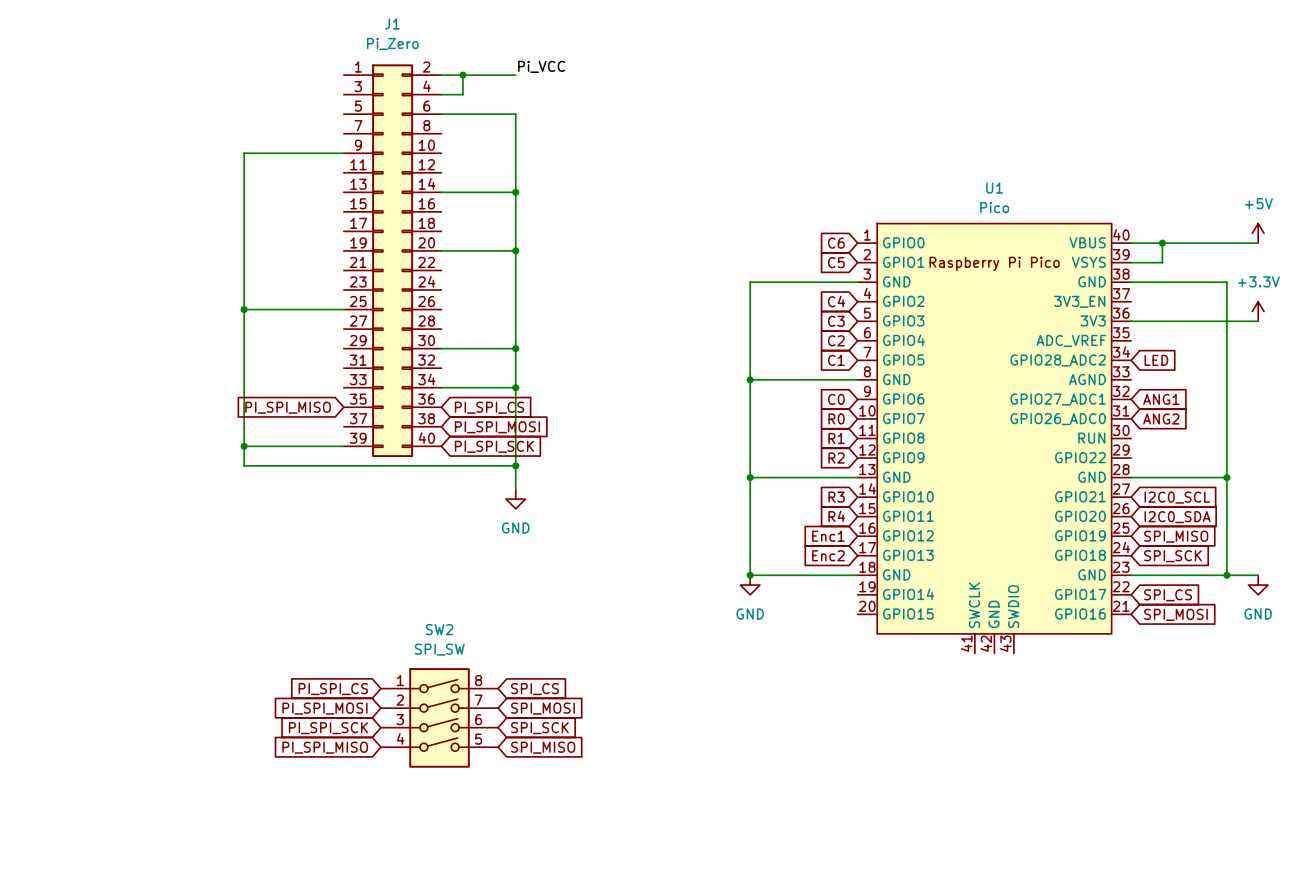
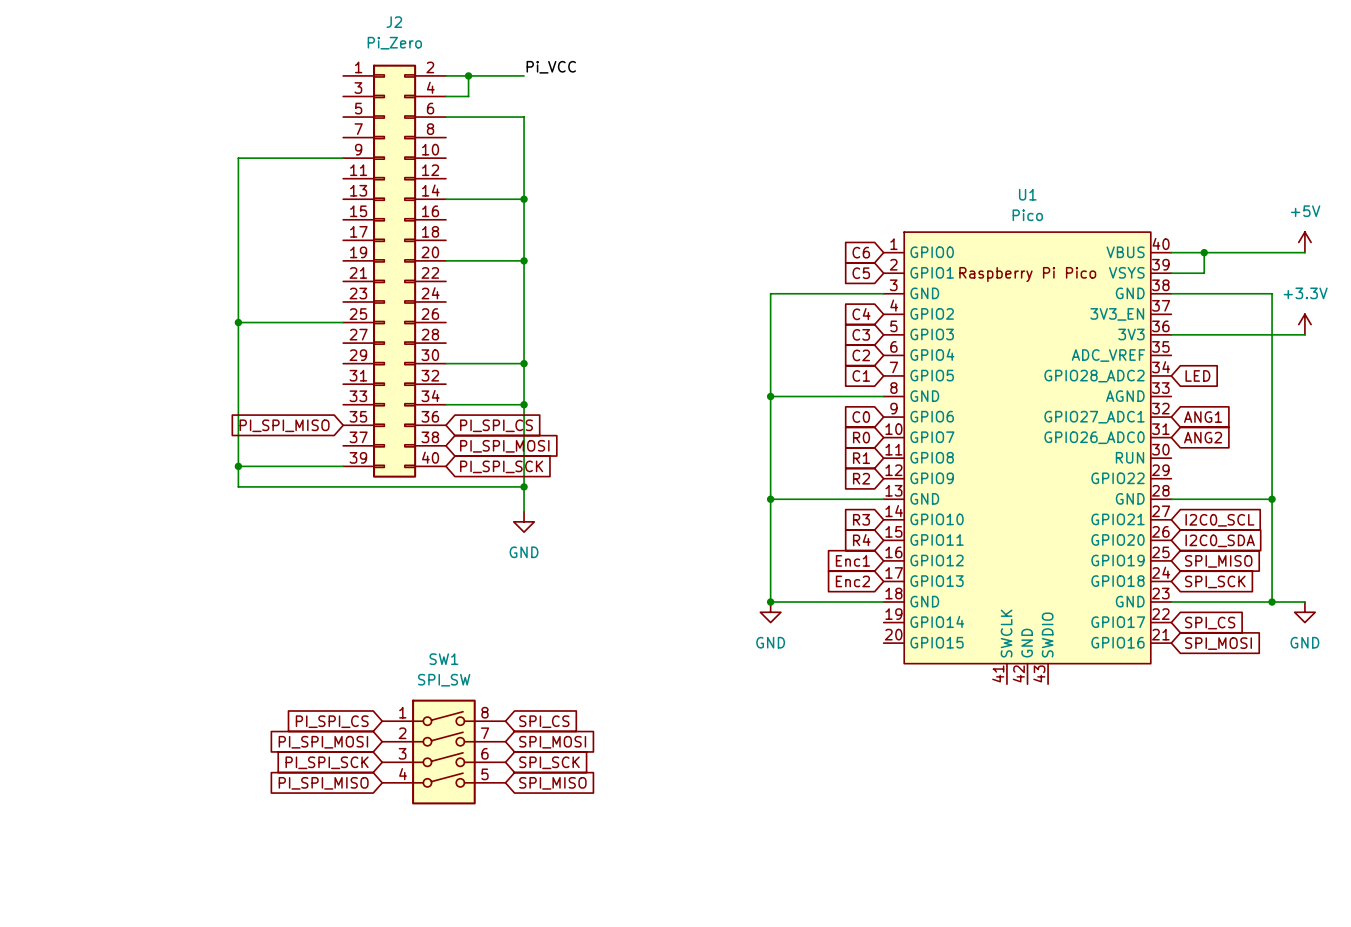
J1 name: J1 (392, 23) -> J2 (394, 22)
SW2 name: SW2 (439, 629) -> SW1 (443, 659)

